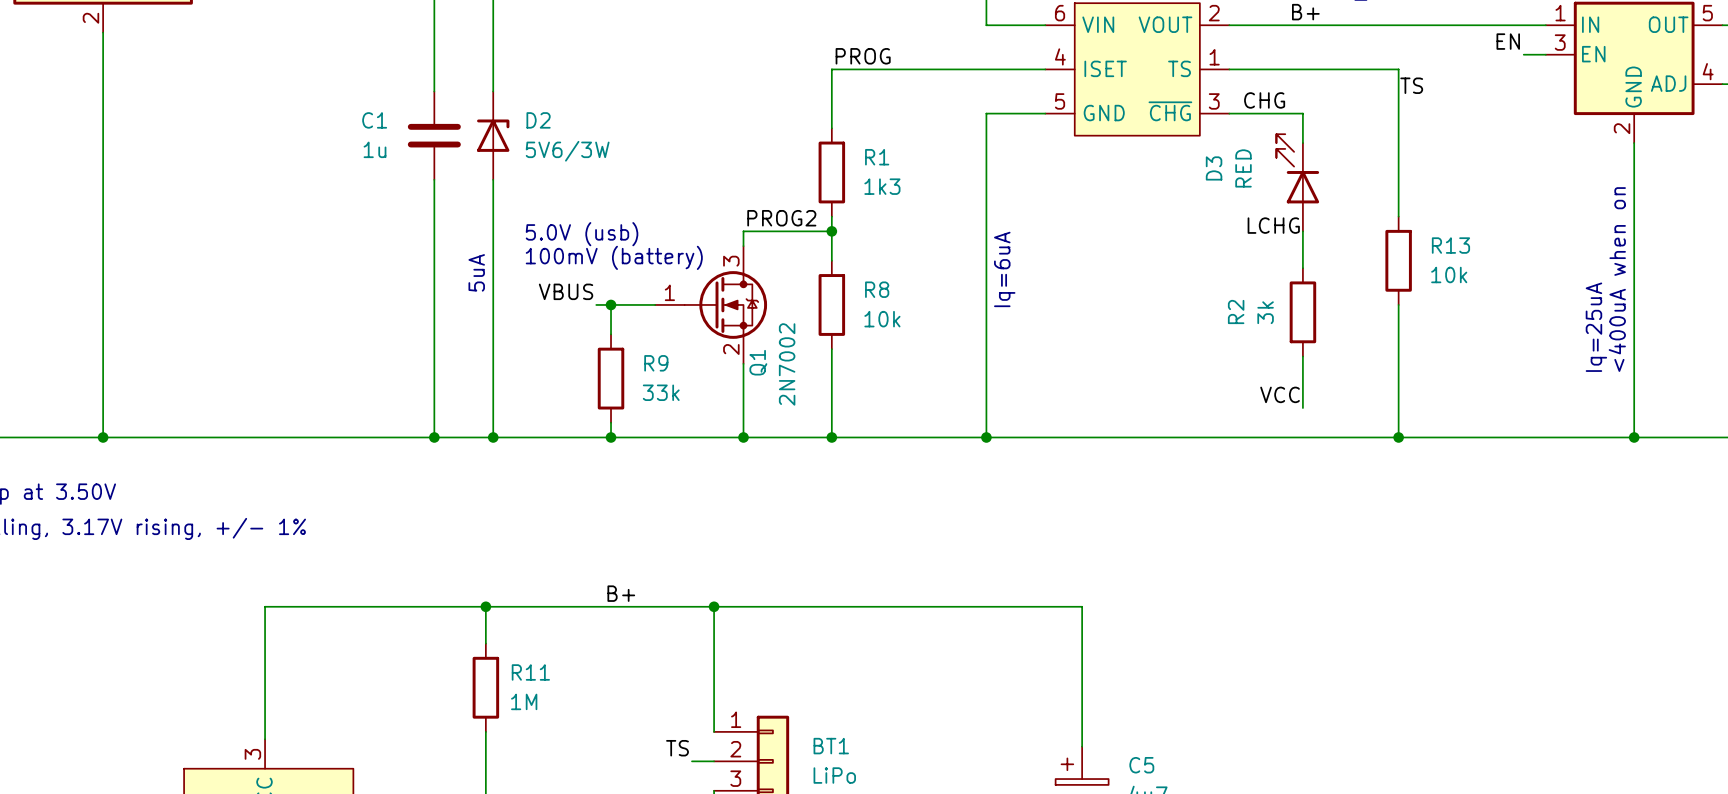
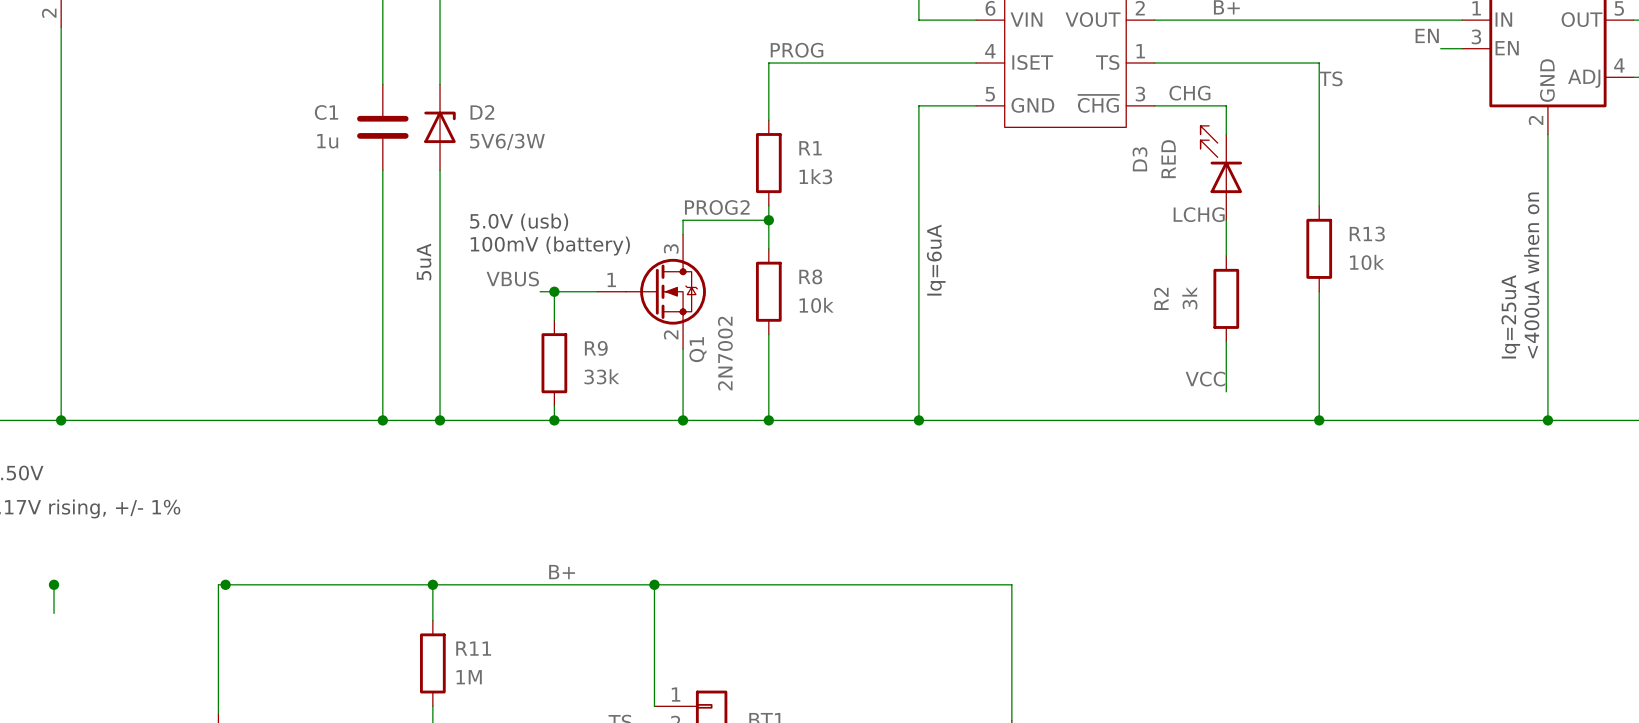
wire: none -> (54, 584) (54, 613)
junction: none -> (54, 584)
junction: none -> (225, 584)

